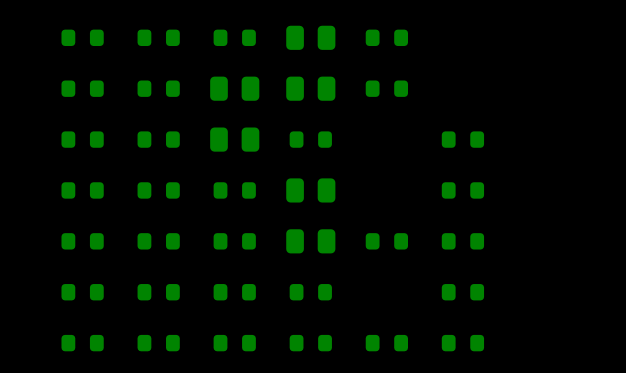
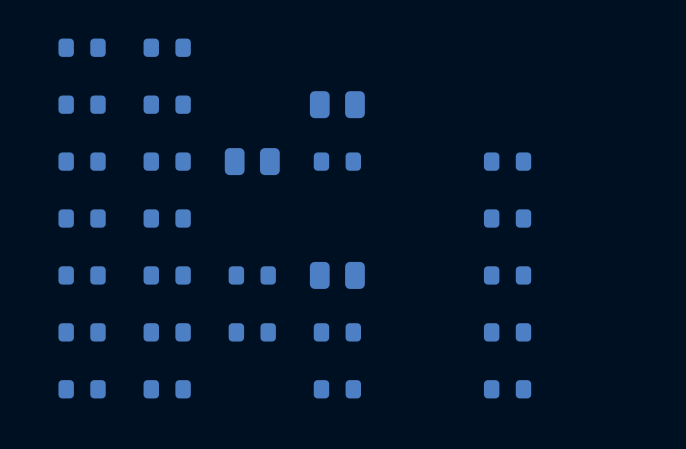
part: (234, 37) -> none
part: (310, 37) -> none
part: (386, 37) -> none
part: (234, 88) -> none
part: (386, 88) -> none
part: (234, 190) -> none
part: (310, 190) -> none
part: (386, 241) -> none
part: (234, 343) -> none
part: (386, 343) -> none

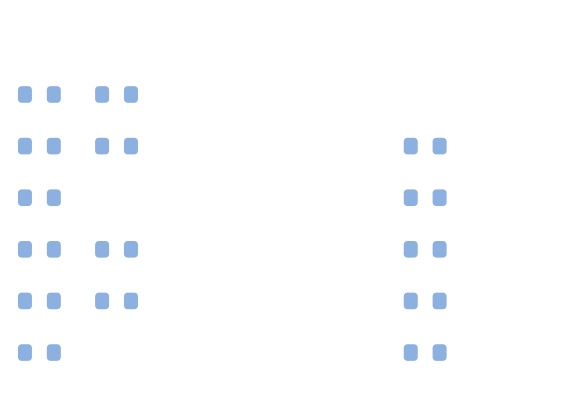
part: (82, 47) -> none
part: (167, 47) -> none
part: (337, 104) -> none
part: (252, 161) -> none
part: (337, 161) -> none
part: (167, 218) -> none
part: (252, 275) -> none
part: (337, 275) -> none
part: (252, 332) -> none
part: (337, 332) -> none
part: (167, 389) -> none
part: (337, 389) -> none

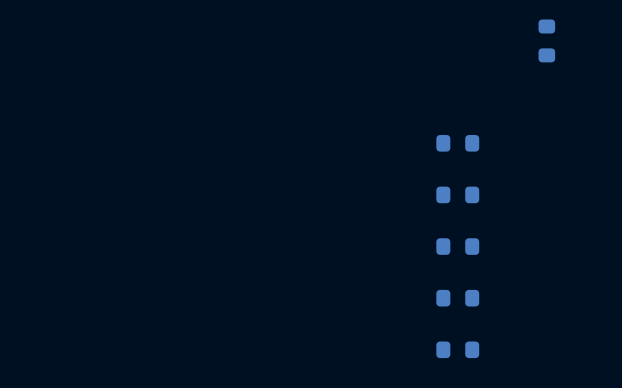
part: none -> (546, 40)
part: (39, 94) -> none
part: (116, 94) -> none
part: (39, 146) -> none
part: (116, 146) -> none
part: (39, 197) -> none
part: (39, 249) -> none
part: (116, 249) -> none
part: (39, 300) -> none
part: (116, 300) -> none
part: (39, 352) -> none

